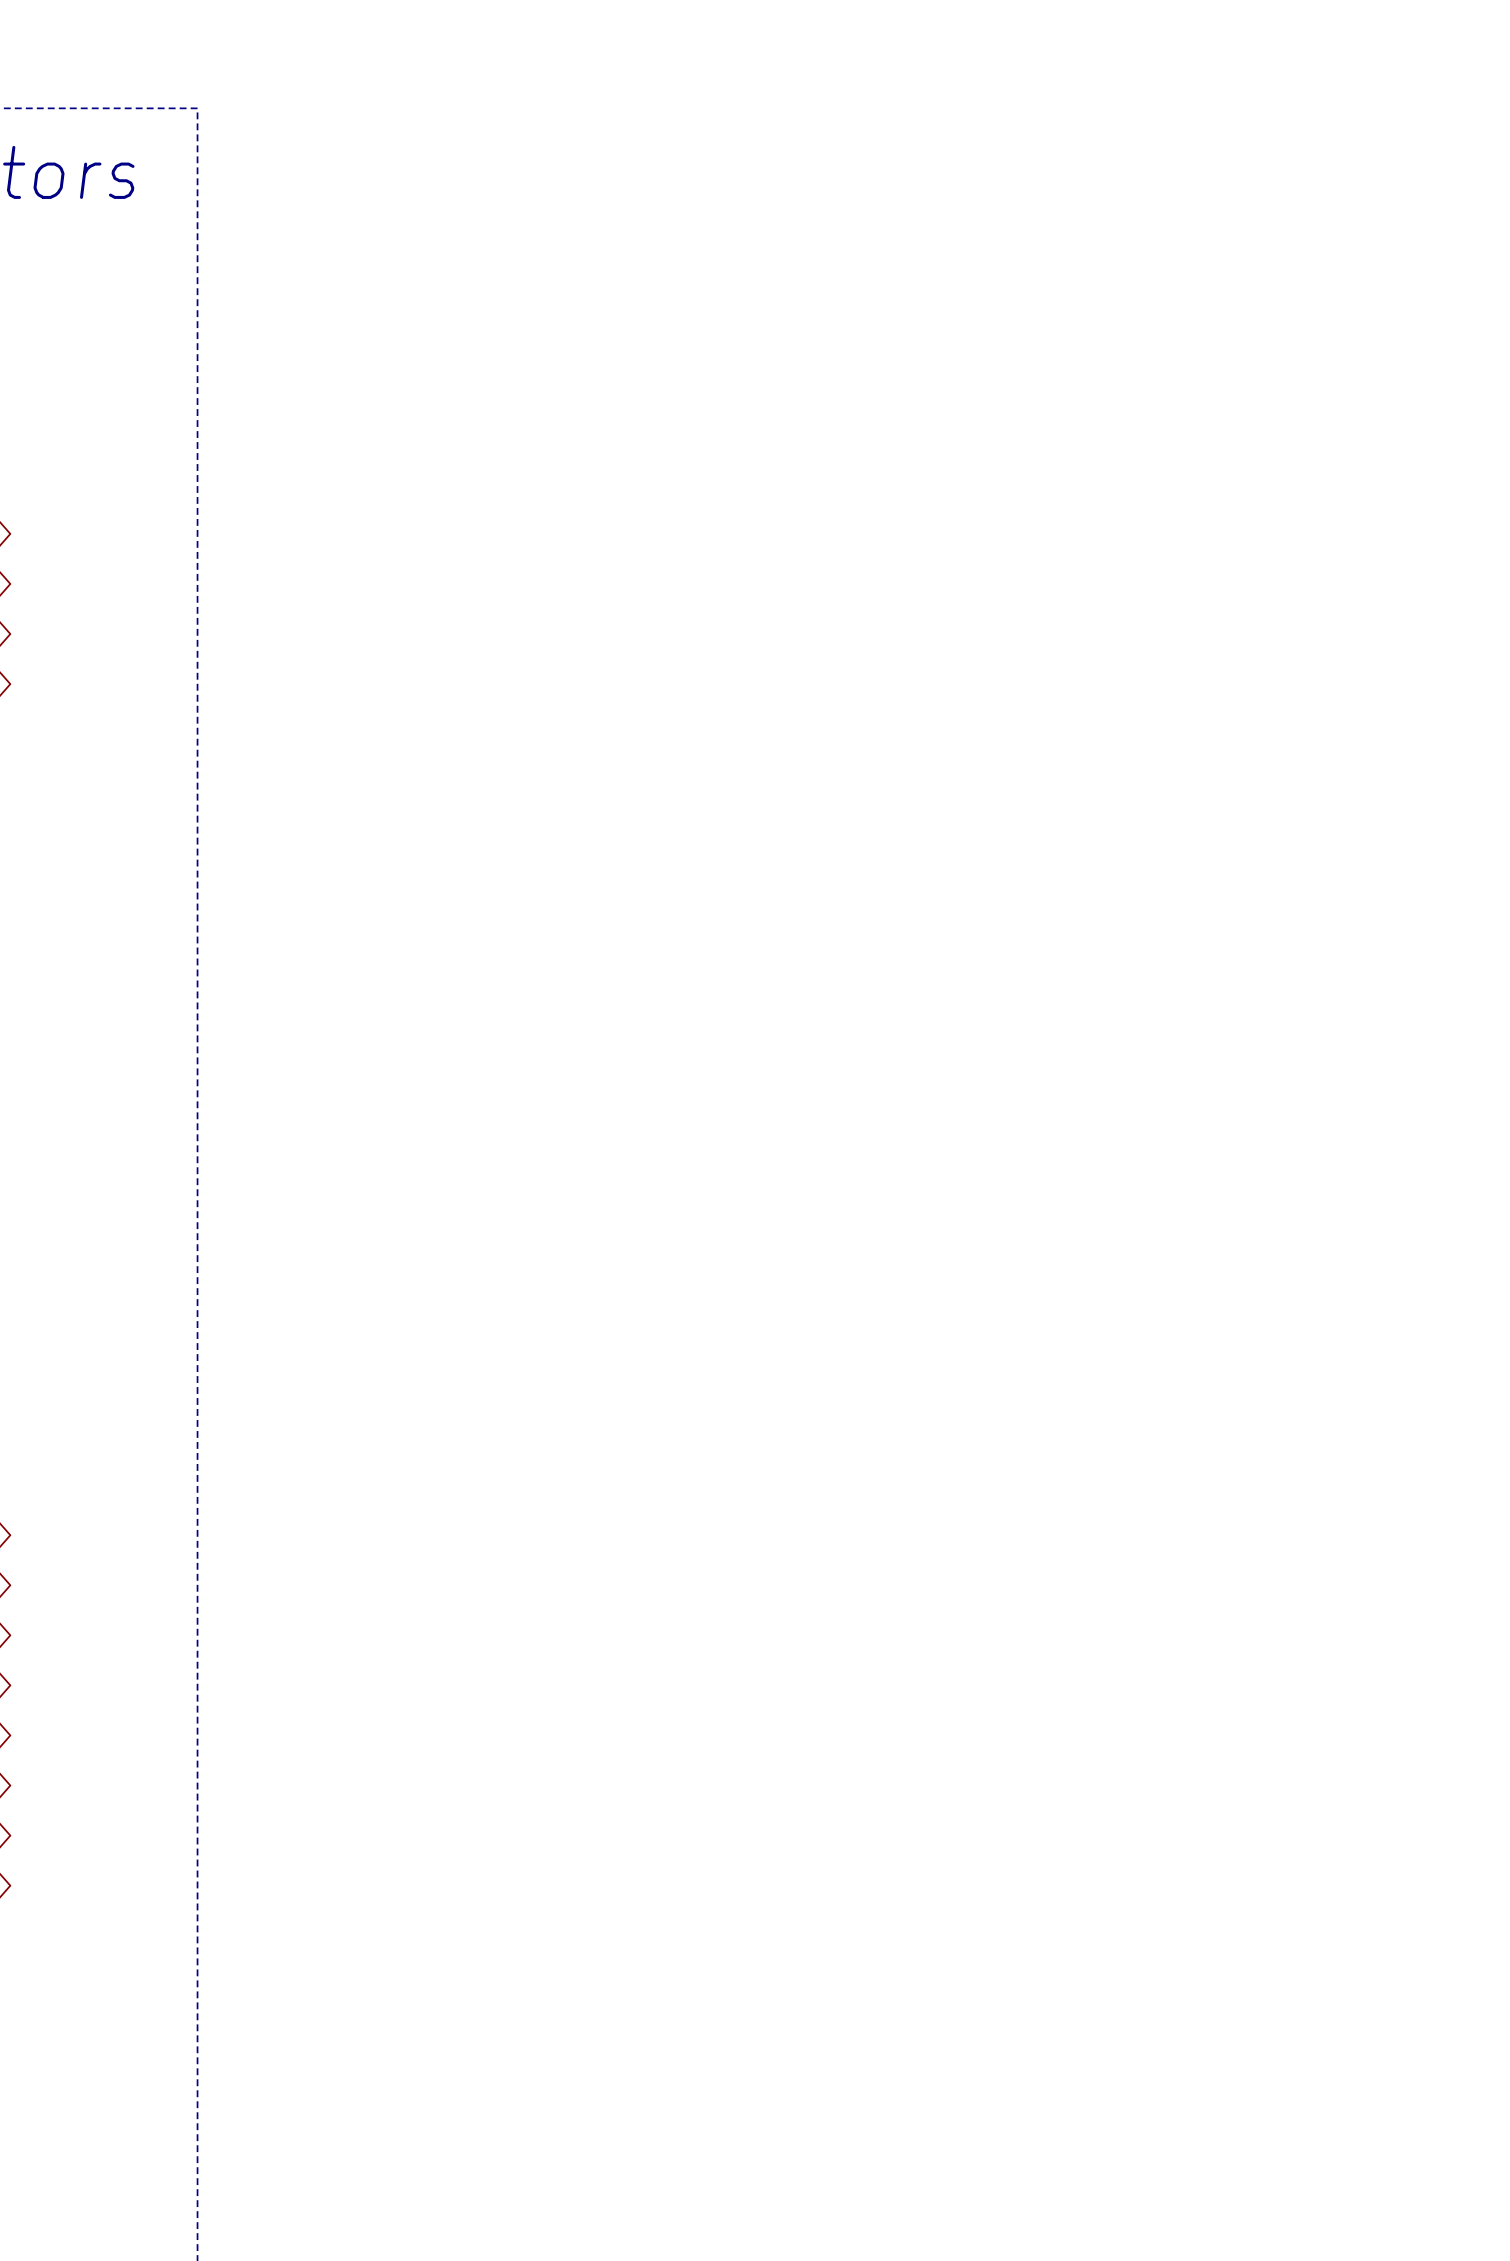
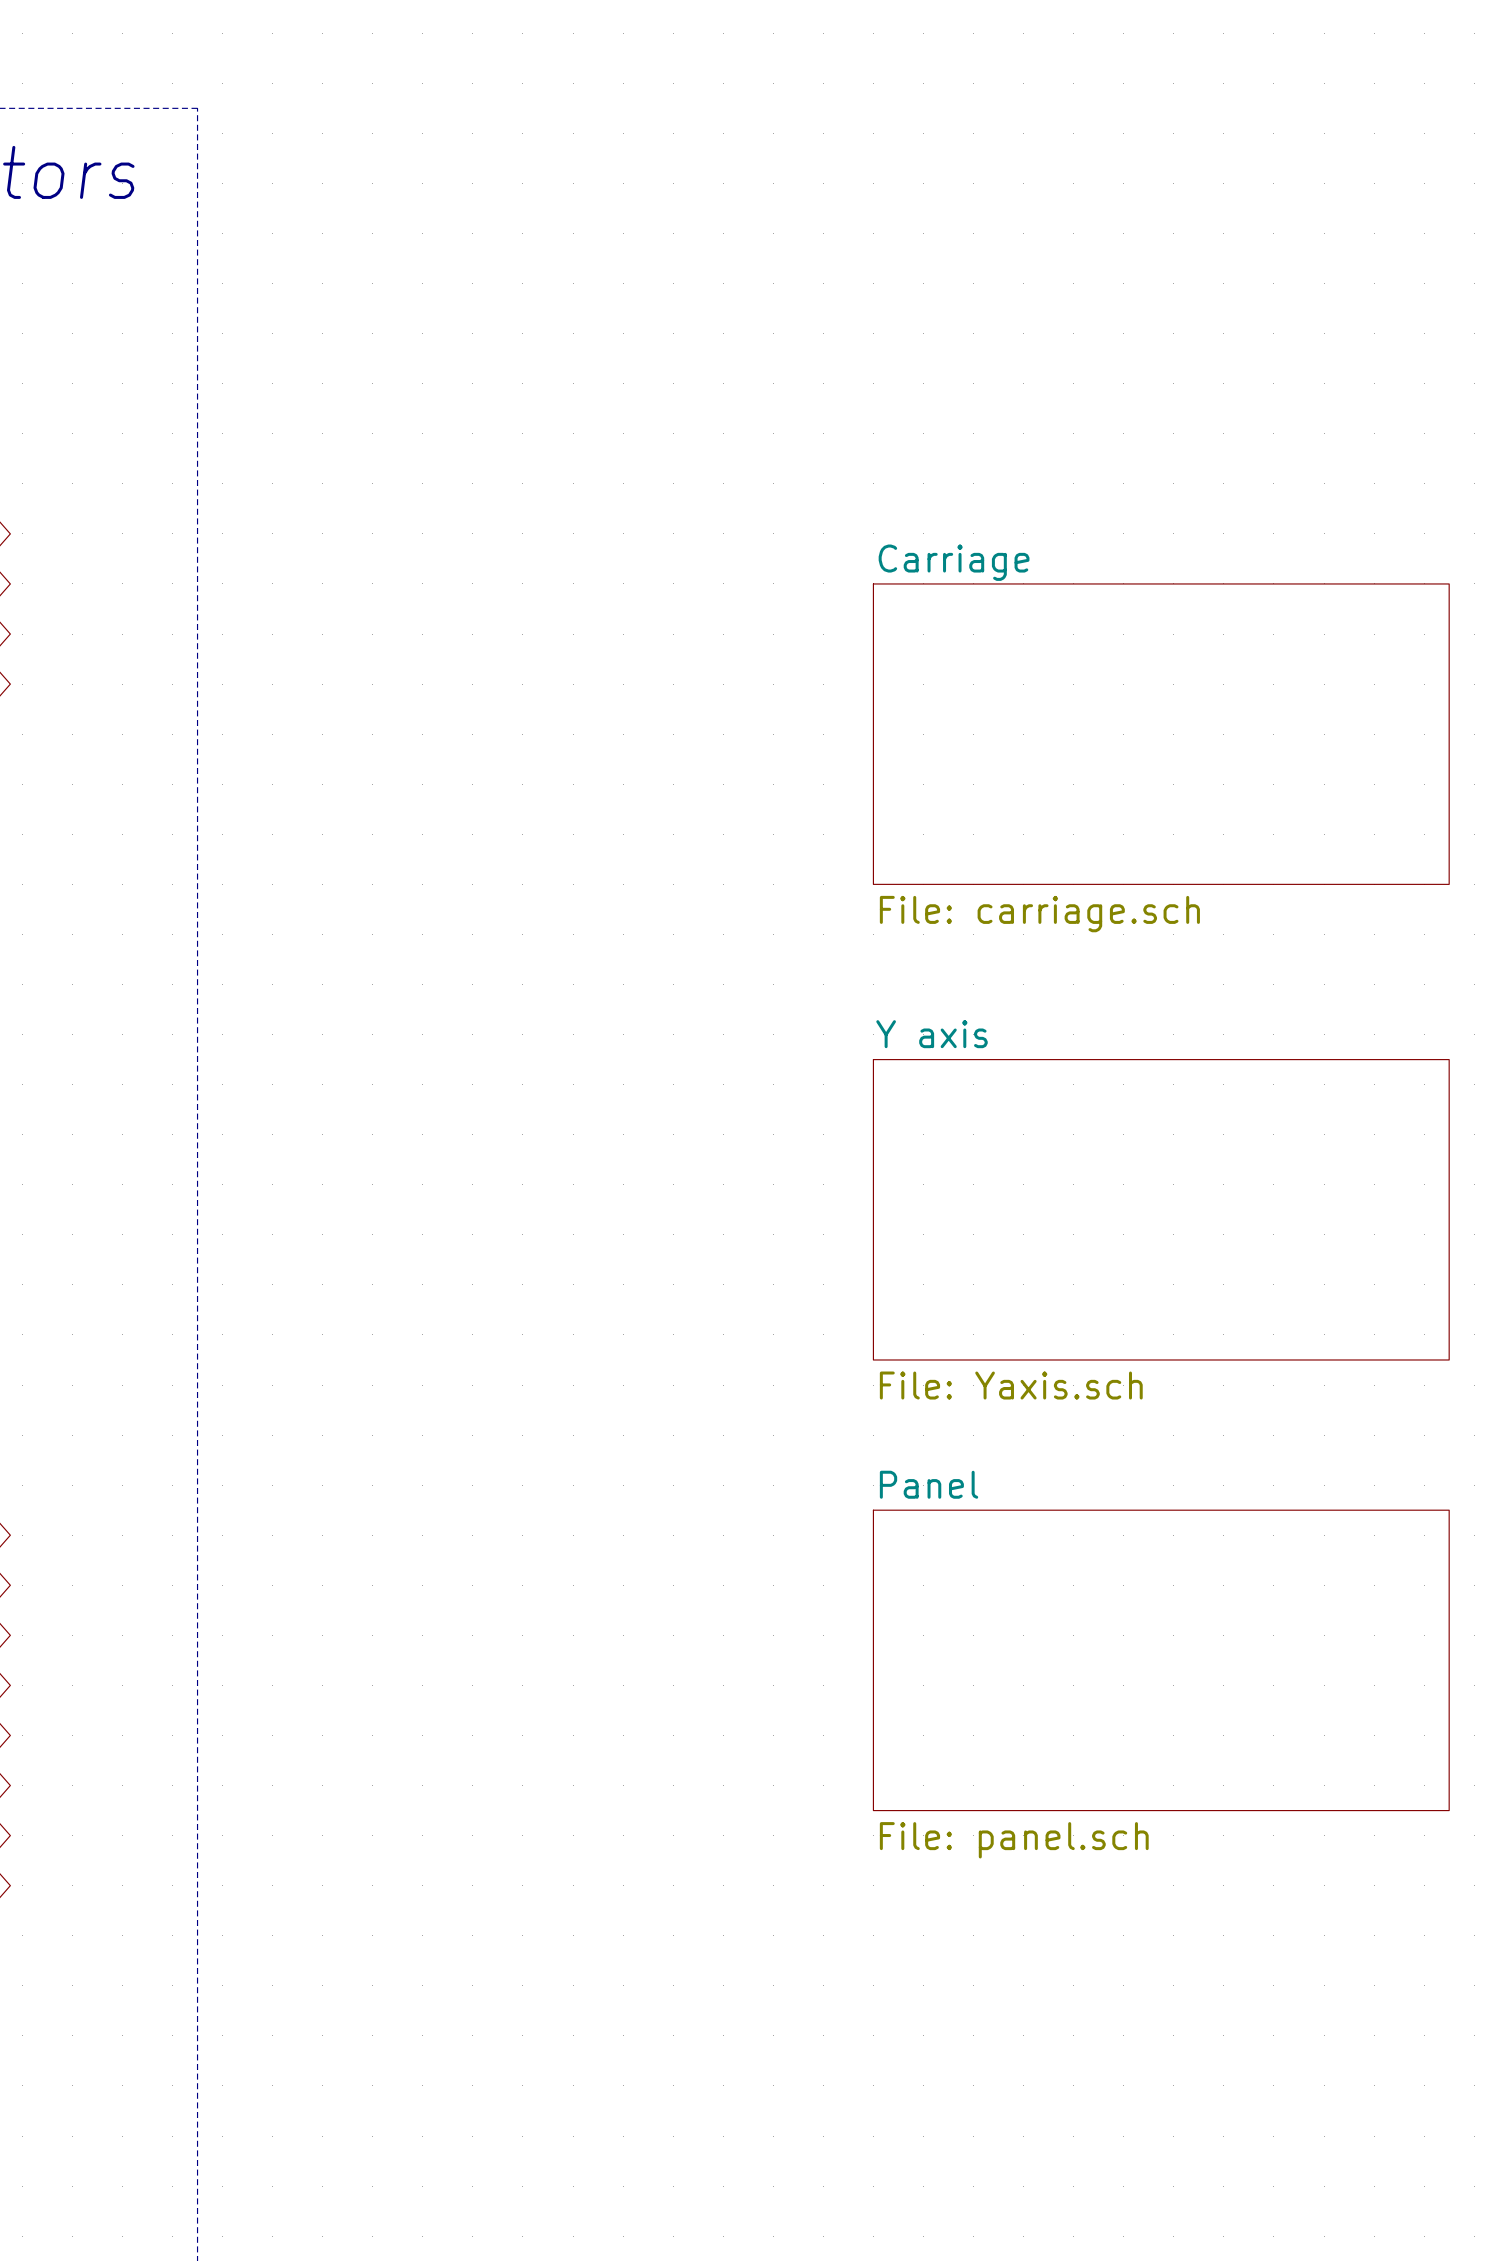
sheet Carriage: none -> File: carriage.sch (1161, 734)
sheet Y axis: none -> File: Yaxis.sch (1161, 1209)
sheet Panel: none -> File: panel.sch (1161, 1660)

